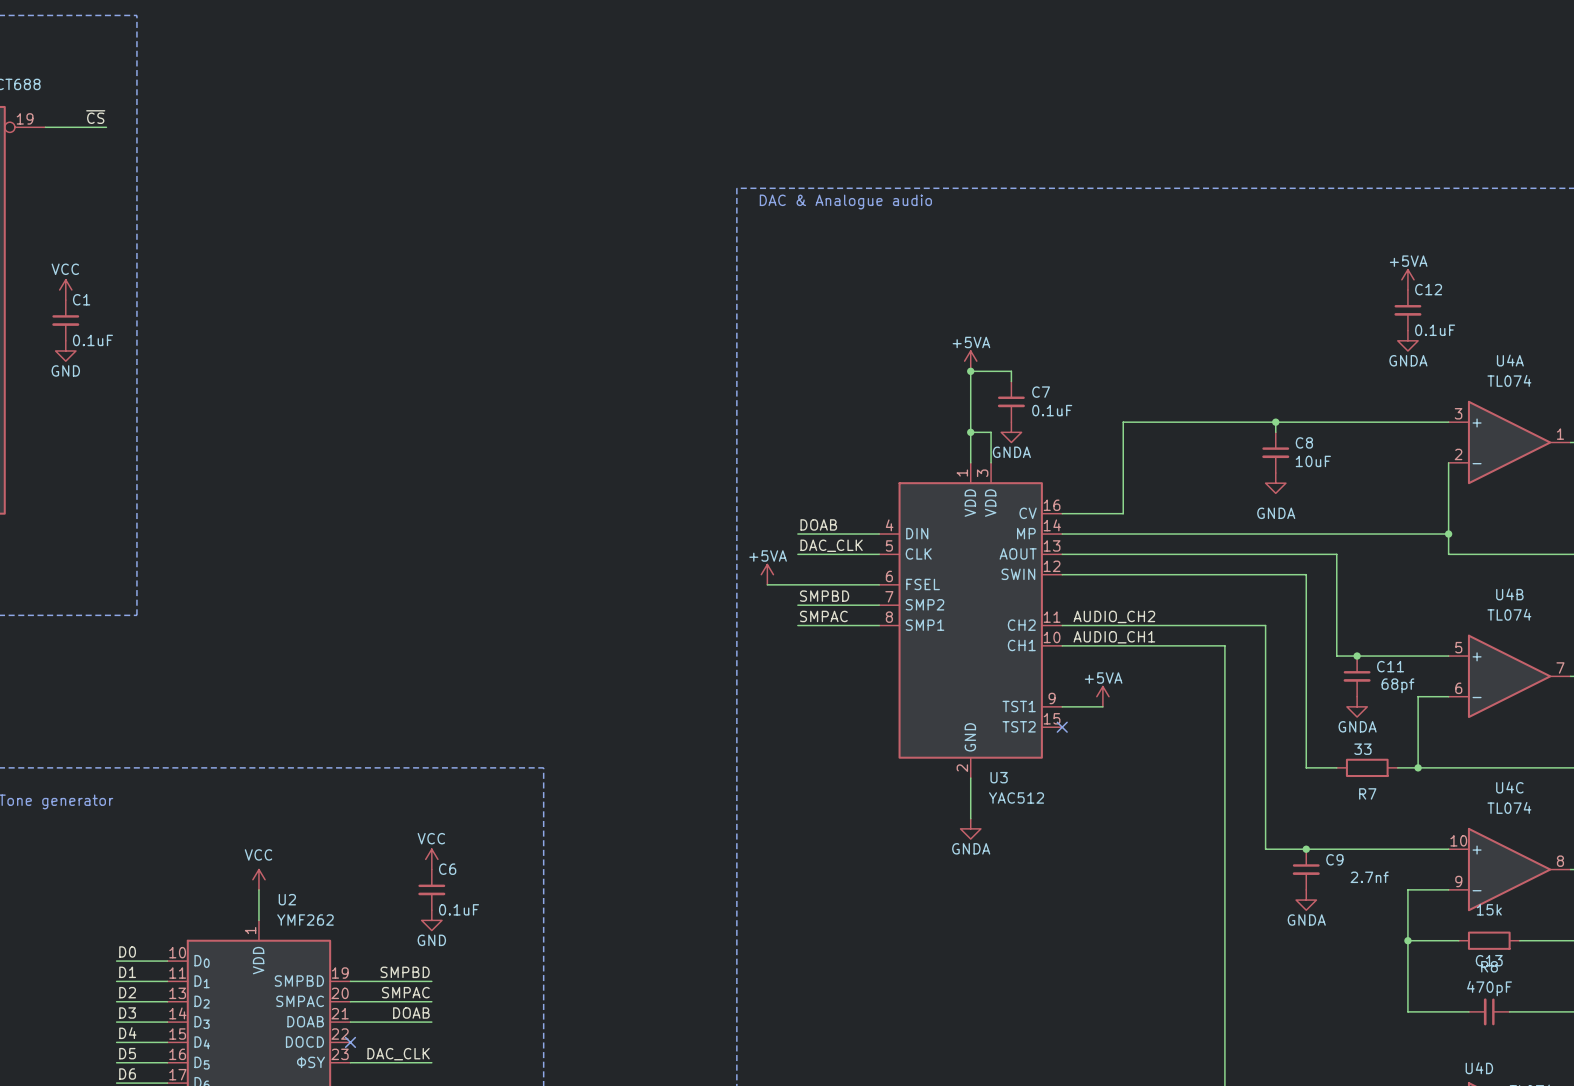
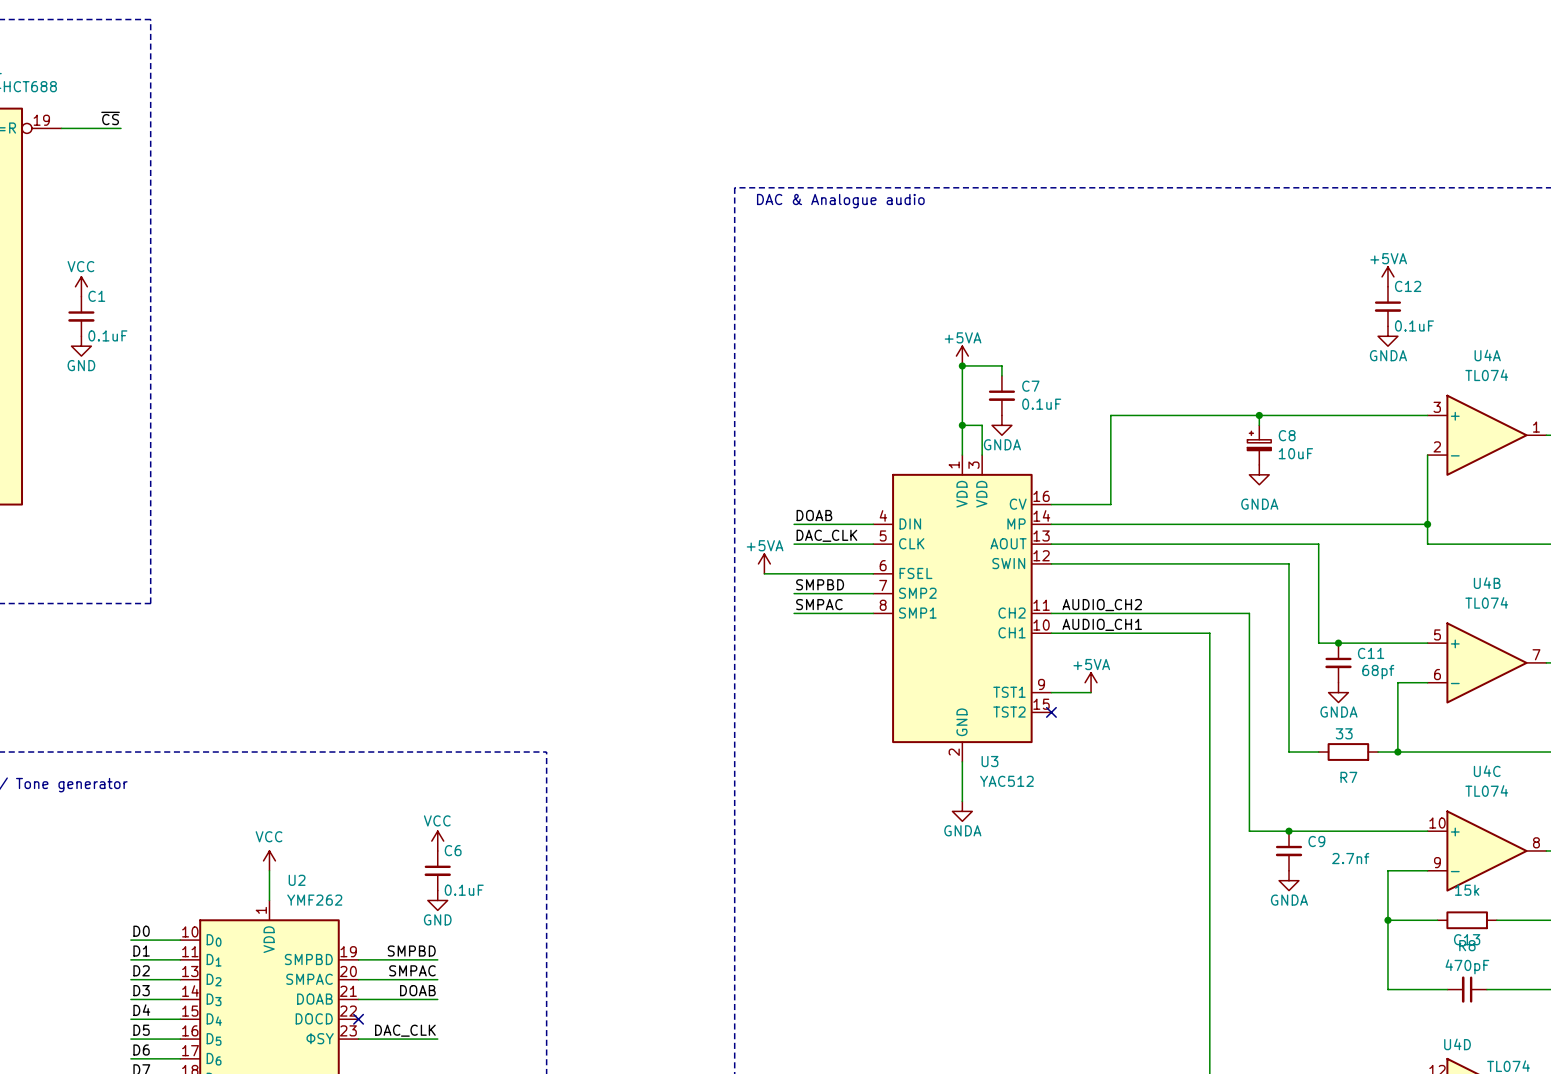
C8 symbol: [1262, 432, 1290, 474] -> [1247, 425, 1272, 465]

